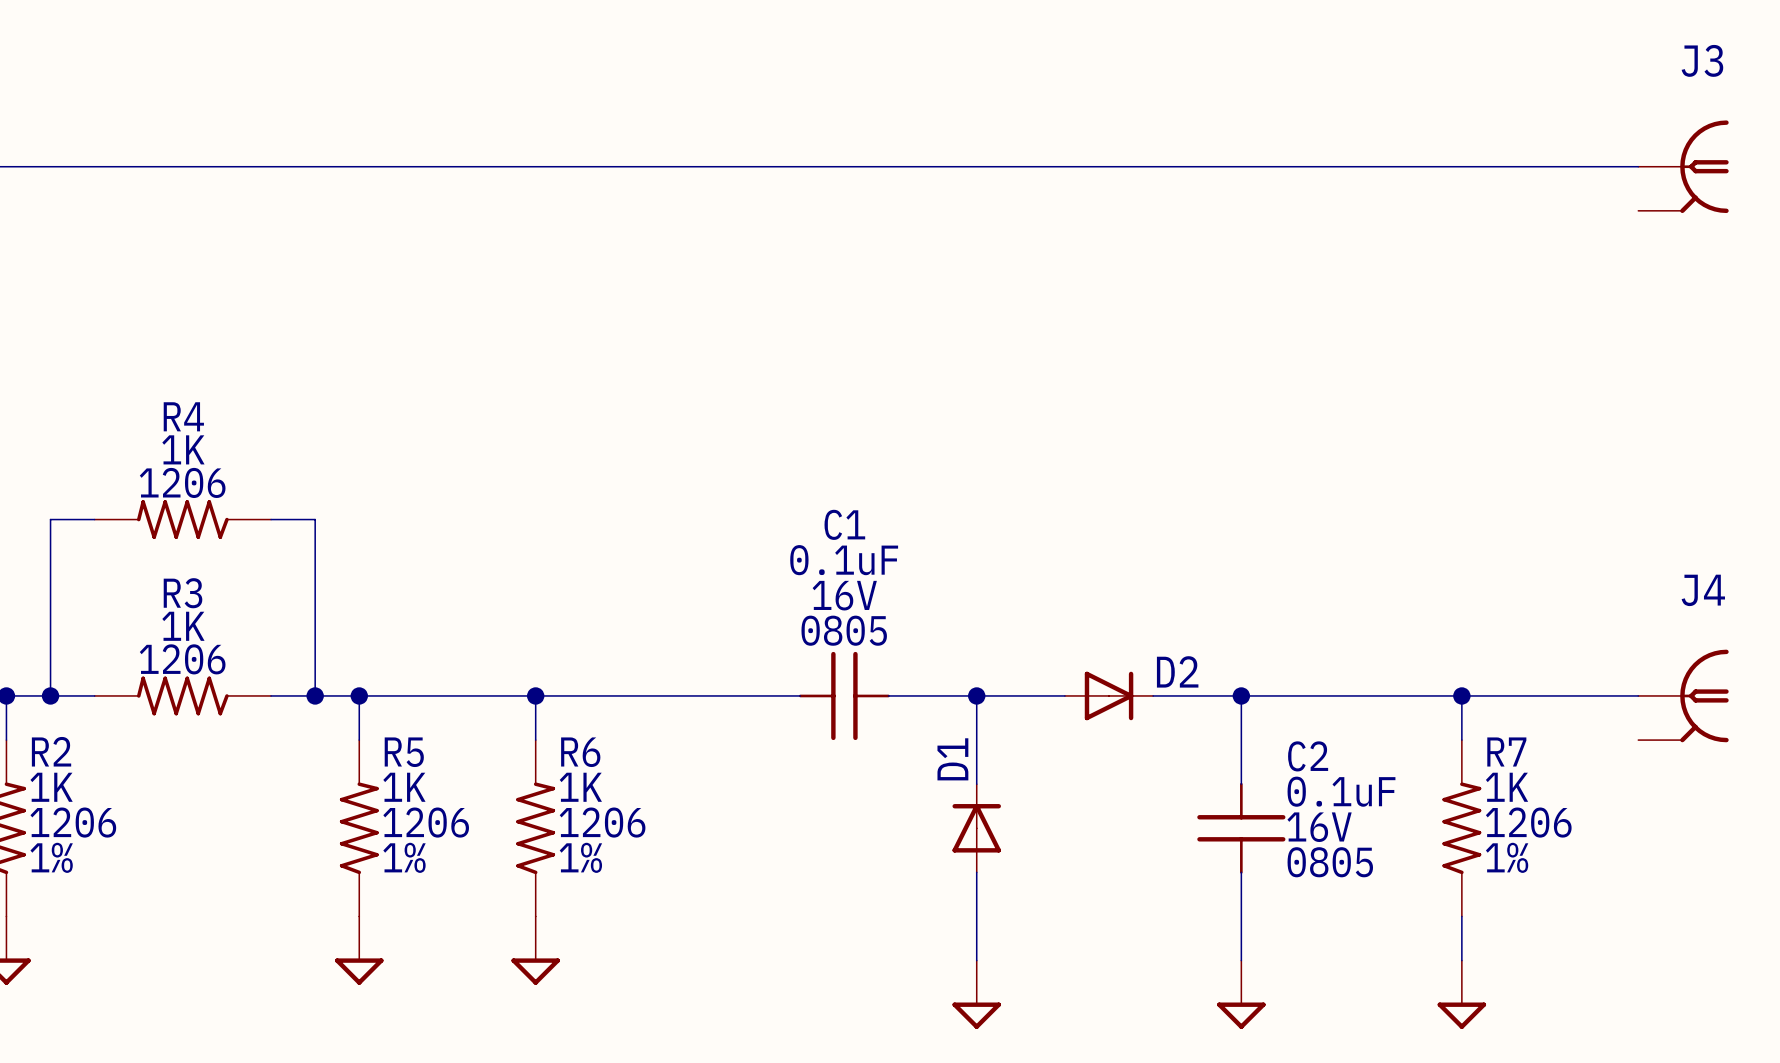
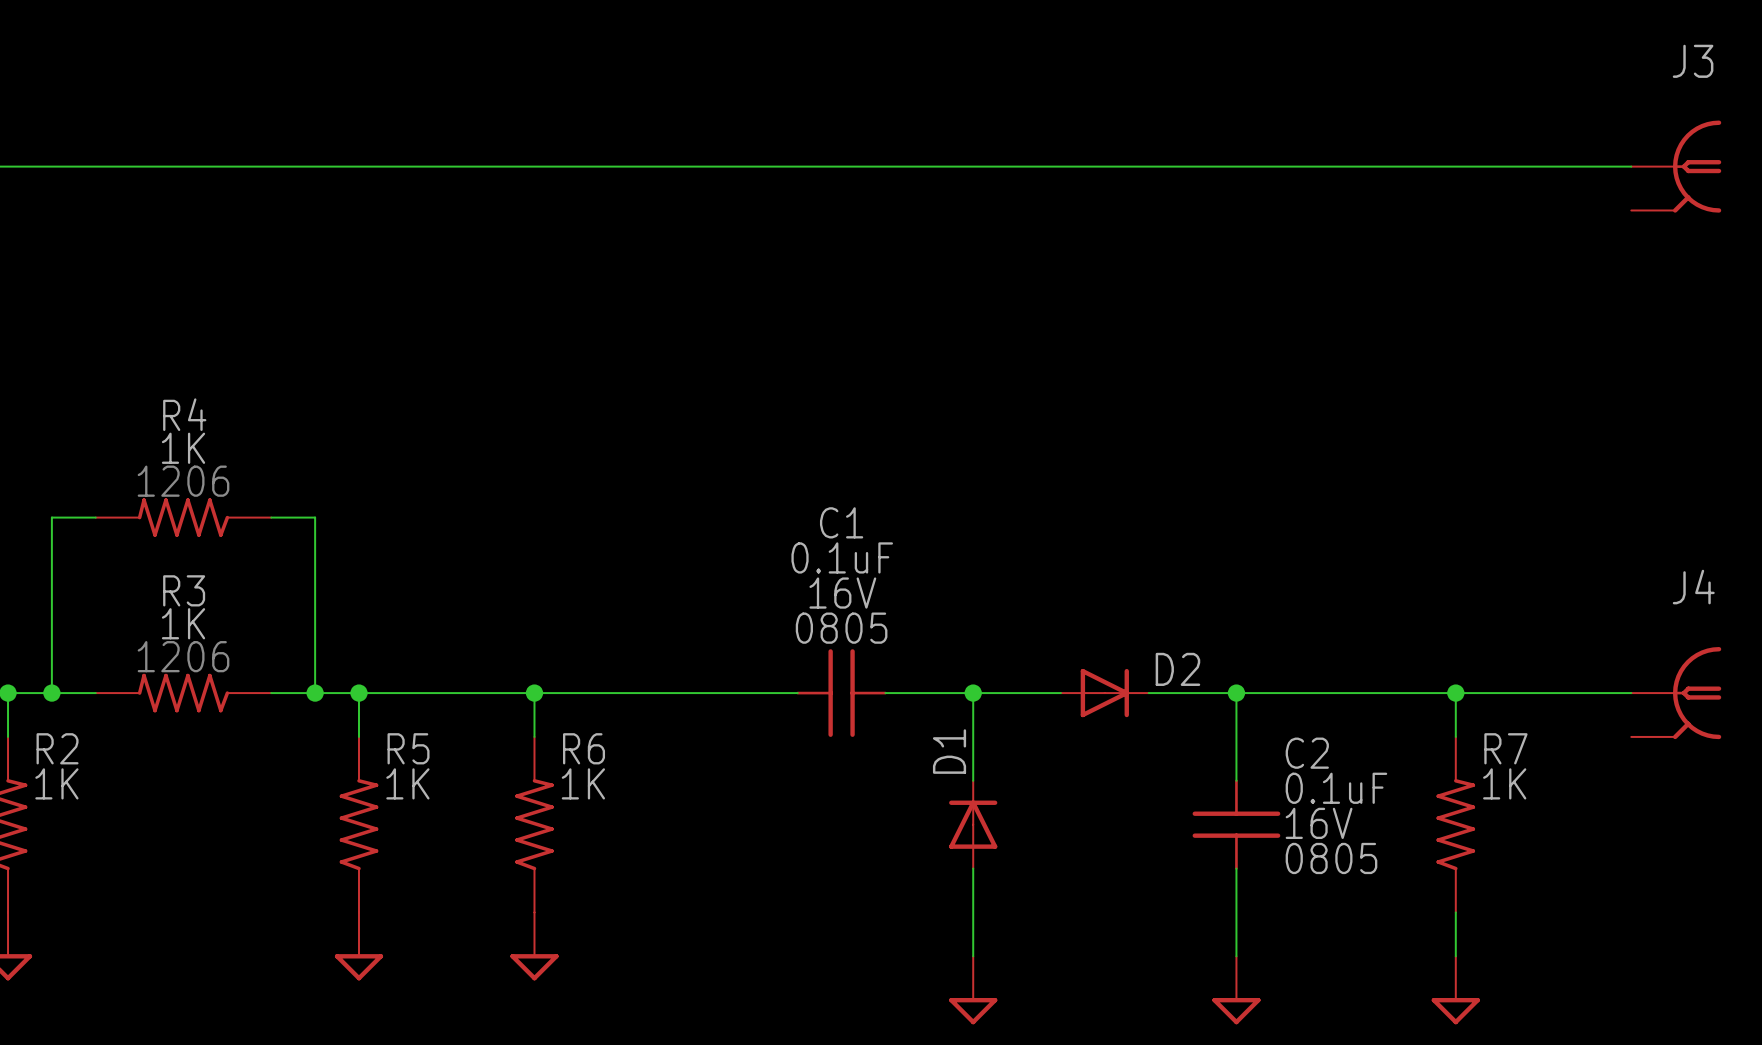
R2 text: 1206 (73, 822) -> none
R5 text: 1206 (426, 822) -> none
R6 text: 1206 (602, 822) -> none
R7 text: 1206 (1528, 822) -> none
R2 text: 1% (51, 857) -> none
R5 text: 1% (404, 857) -> none
R6 text: 1% (580, 857) -> none
R7 text: 1% (1507, 857) -> none

